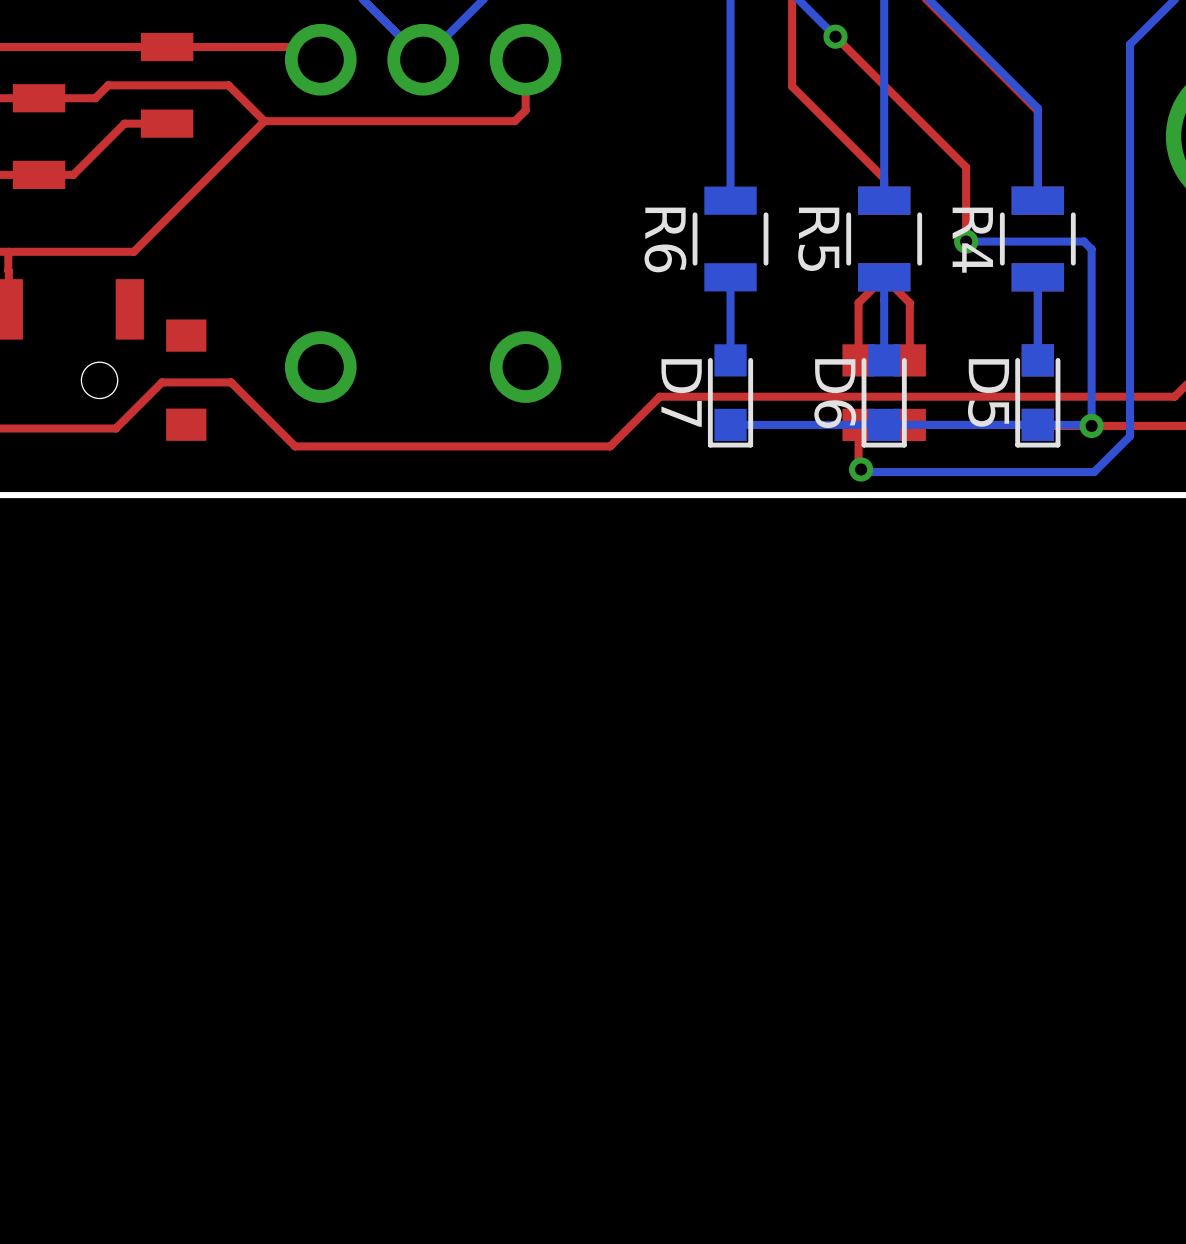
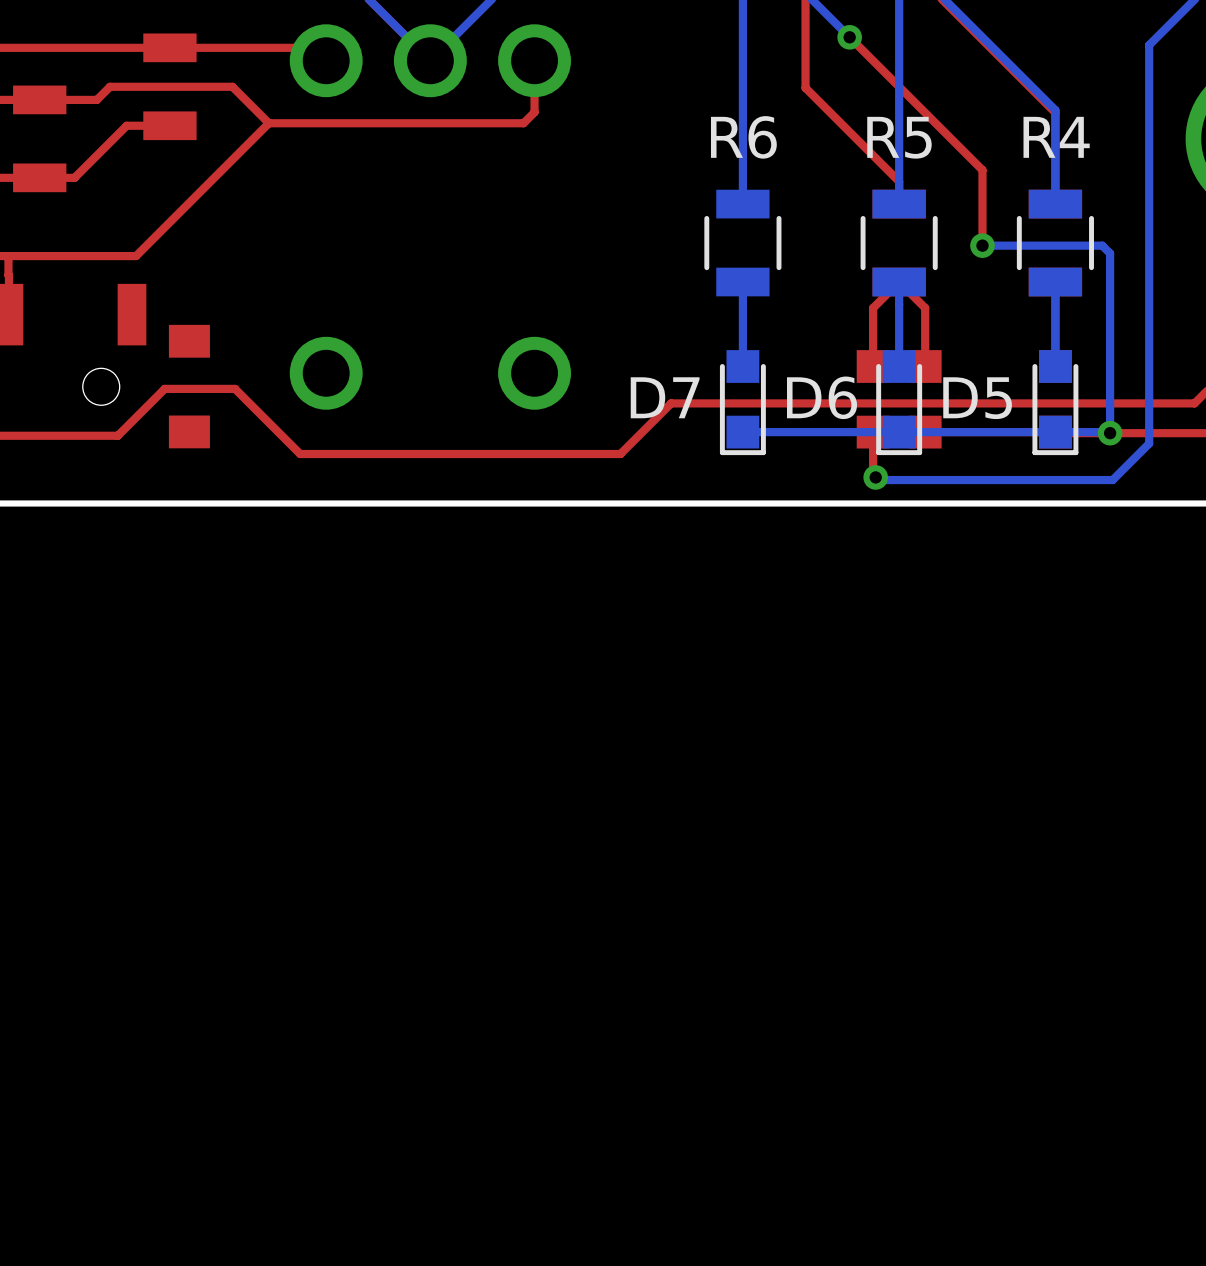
R6 name rotation: 0° (665, 239) -> 90° counterclockwise (743, 137)
R6 name position: R6 (665, 239) -> R6 (743, 137)
R5 name rotation: 0° (818, 239) -> 90° counterclockwise (899, 137)
R5 name position: R5 (818, 239) -> R5 (899, 137)
R4 name rotation: 0° (972, 240) -> 90° counterclockwise (1056, 137)
R4 name position: R4 (972, 240) -> R4 (1056, 137)
D5 name rotation: 0° (988, 392) -> 90° counterclockwise (977, 398)
D7 name rotation: 0° (681, 393) -> 90° counterclockwise (665, 397)
D6 name rotation: 0° (835, 393) -> 90° counterclockwise (822, 397)

